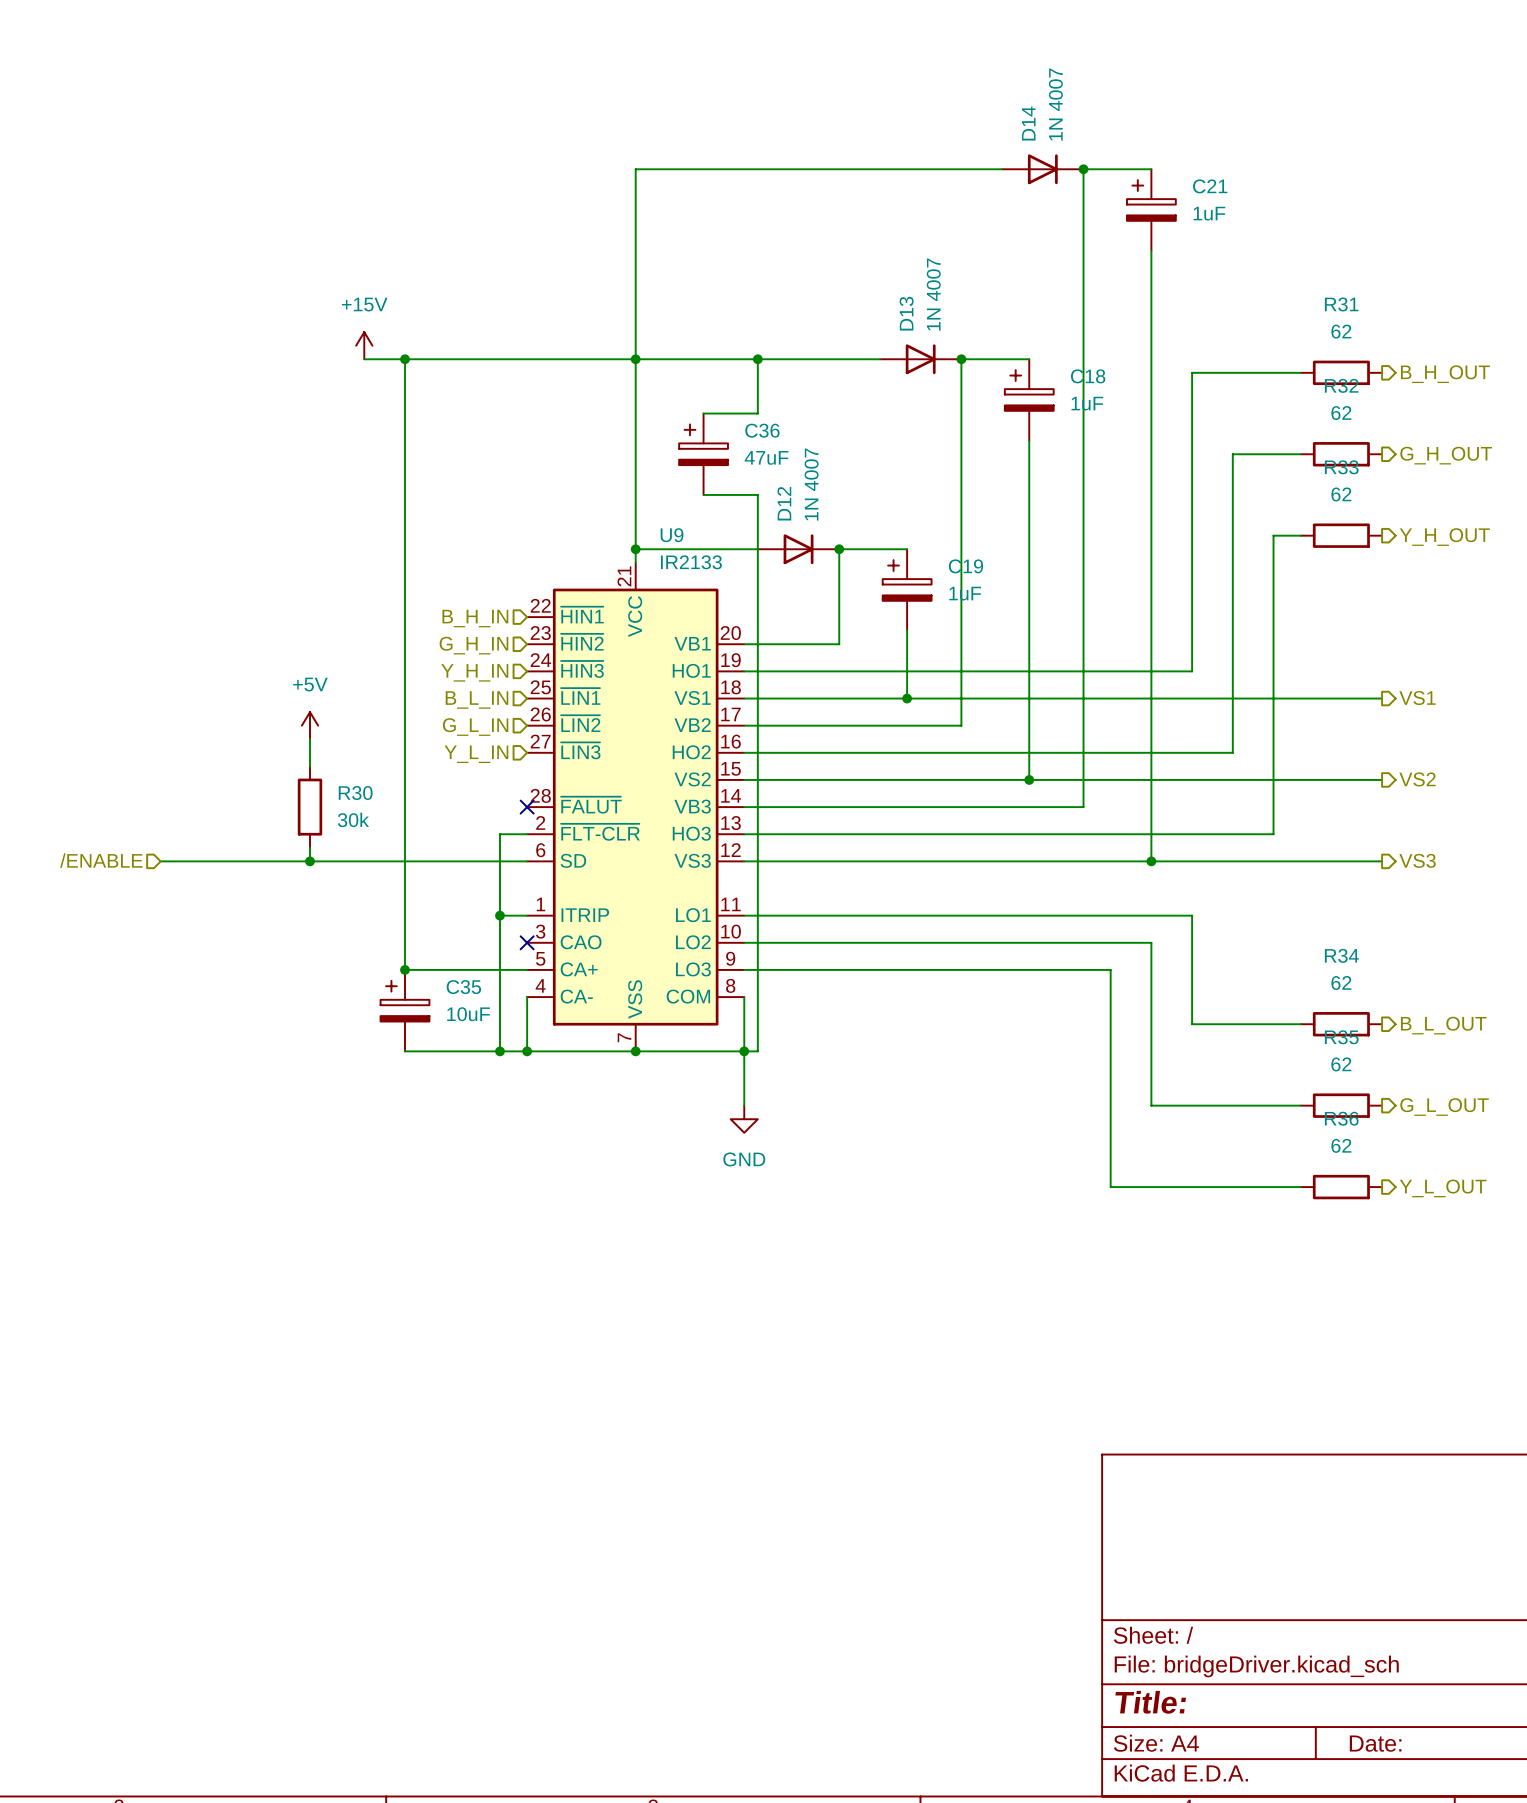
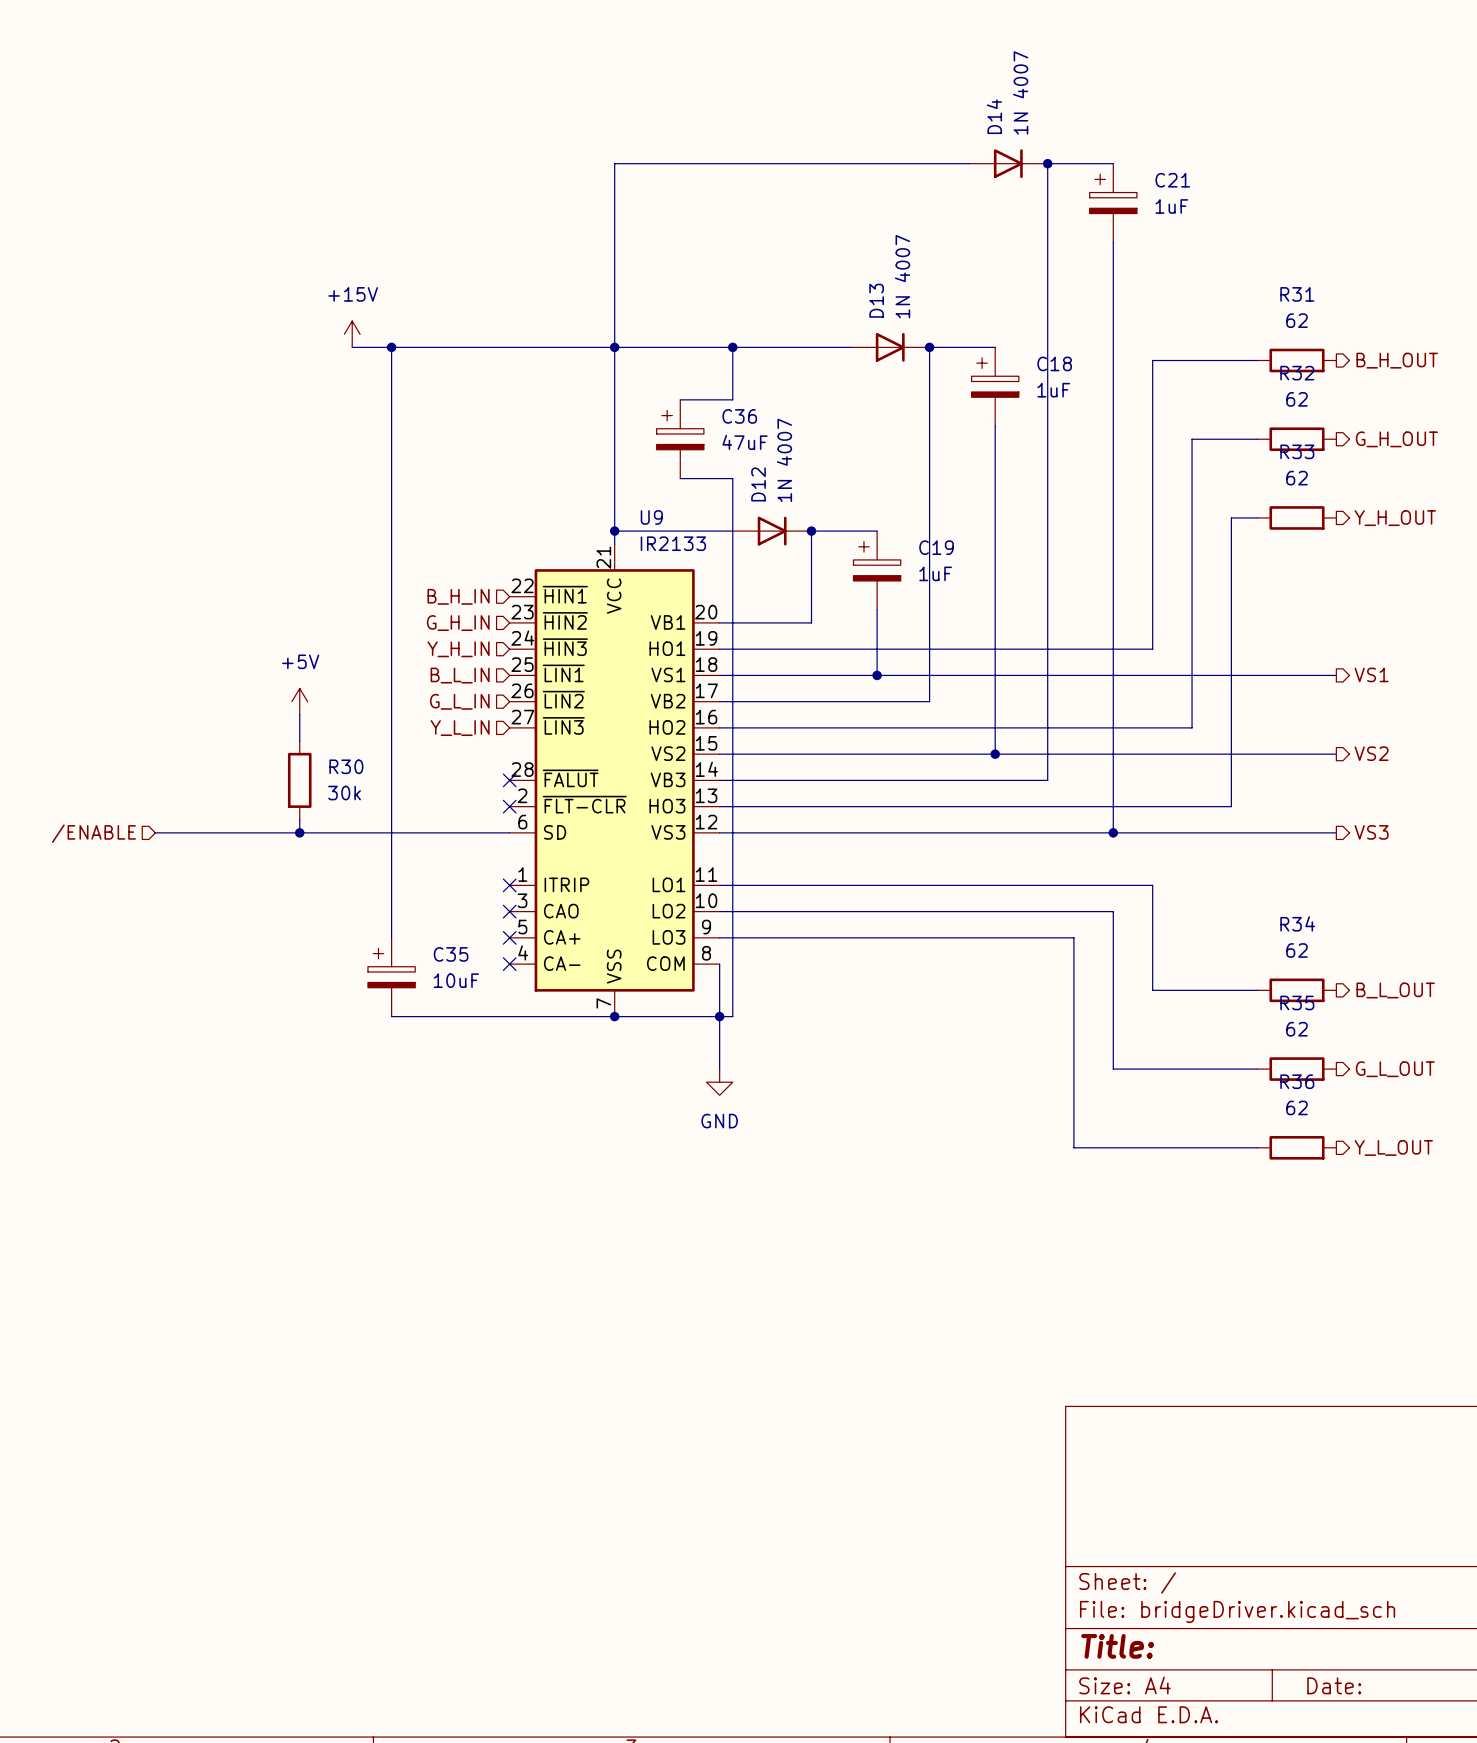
wire: (527, 834) (499, 834) (499, 1051) -> none
no-connect mark: none -> (509, 806)
wire: (499, 915) (527, 915) -> none
junction: (499, 915) -> none
no-connect mark: none -> (509, 885)
wire: (404, 969) (527, 969) -> none
junction: (404, 969) -> none
no-connect mark: none -> (509, 937)
wire: (527, 997) (527, 1051) -> none
no-connect mark: none -> (509, 964)
junction: (499, 1051) -> none
junction: (527, 1051) -> none

